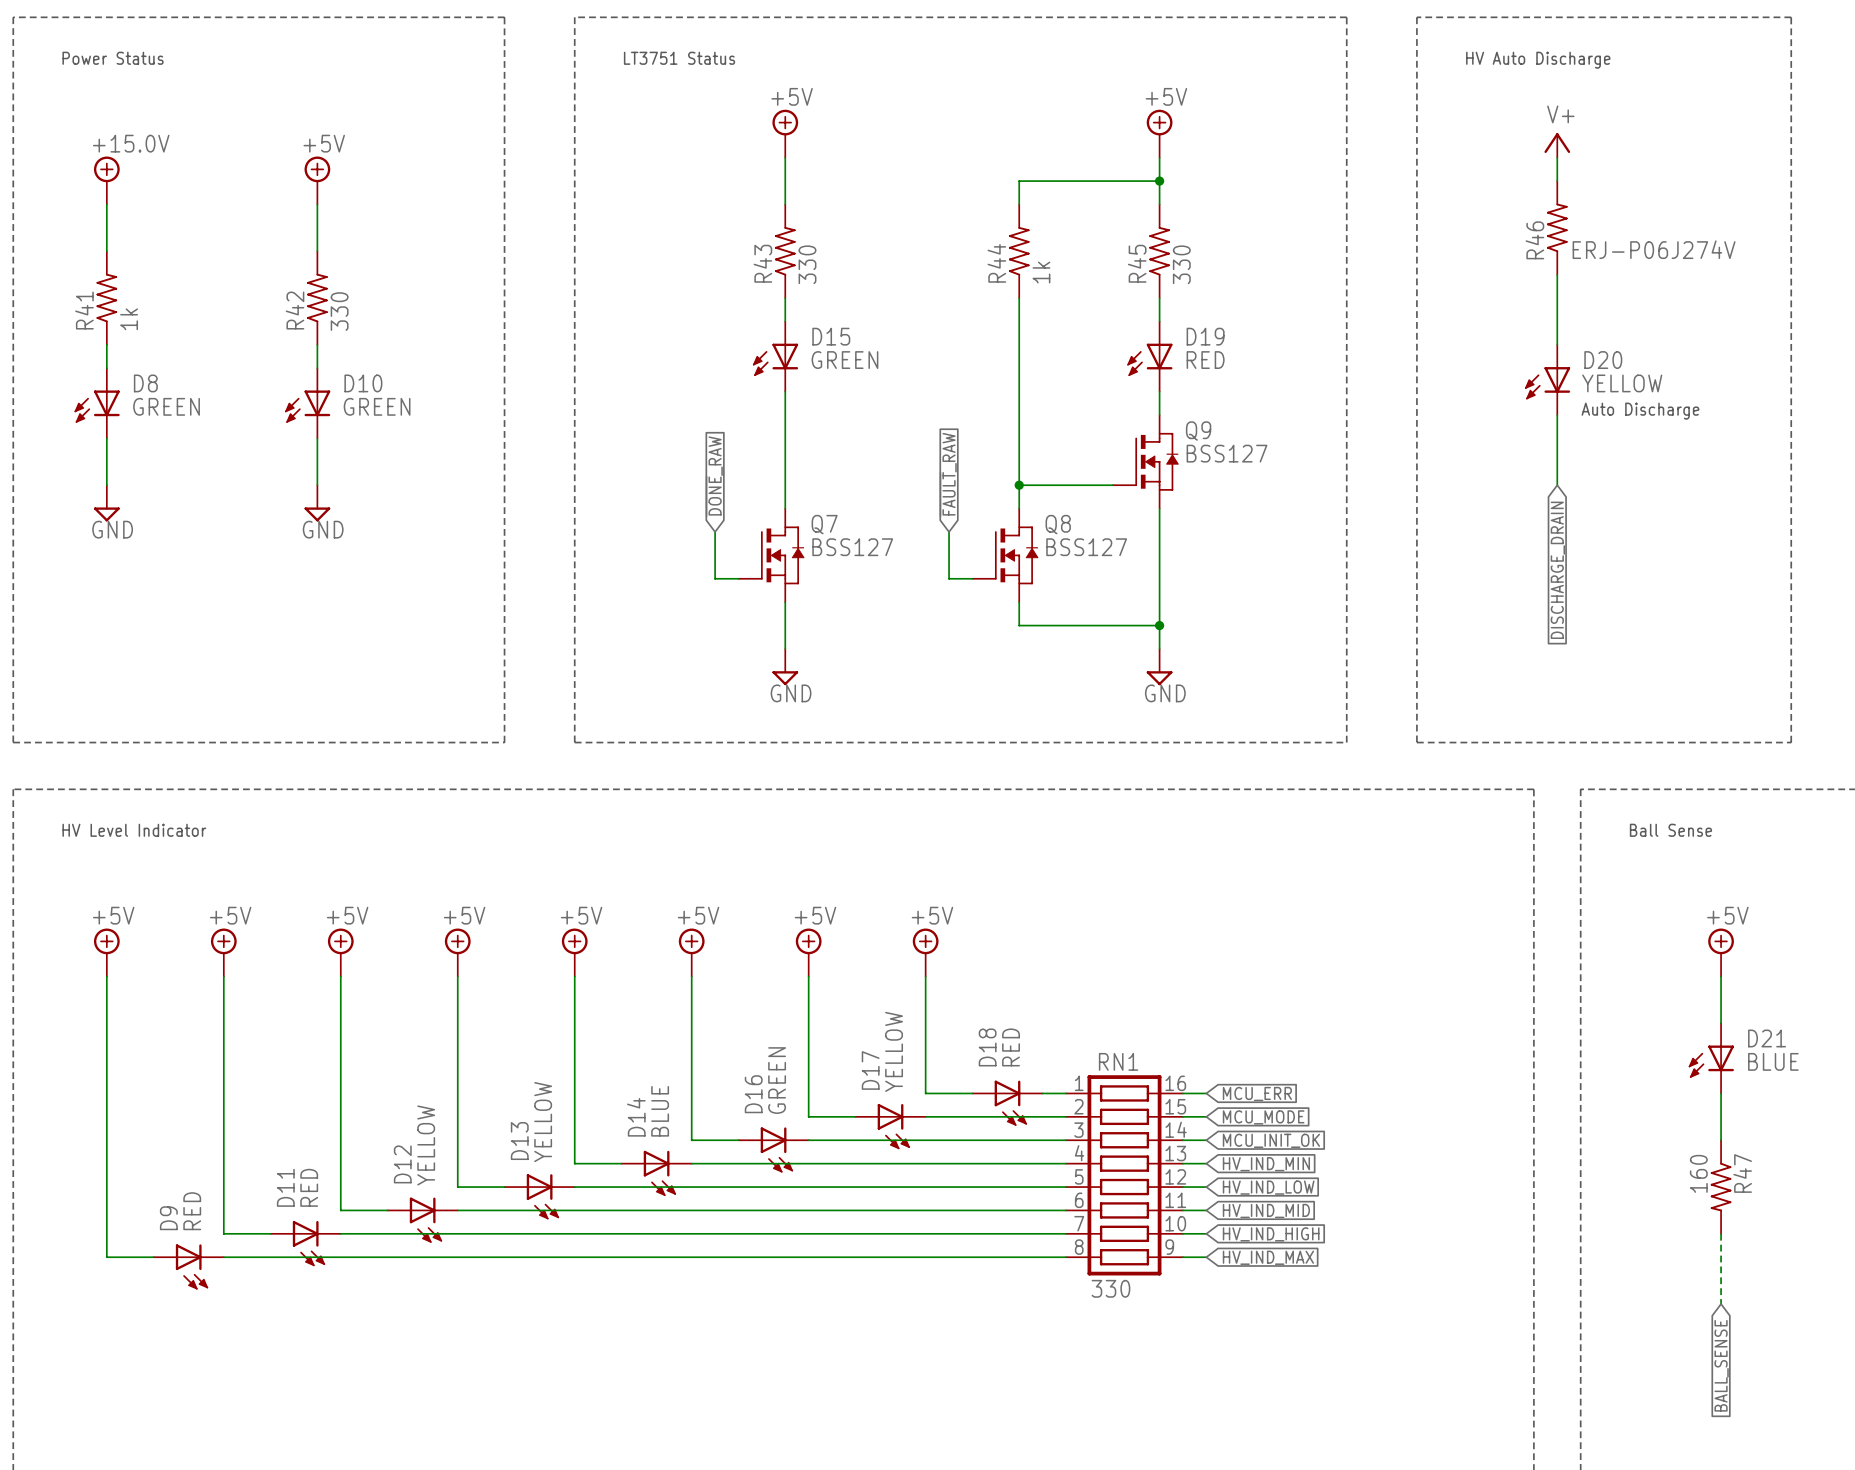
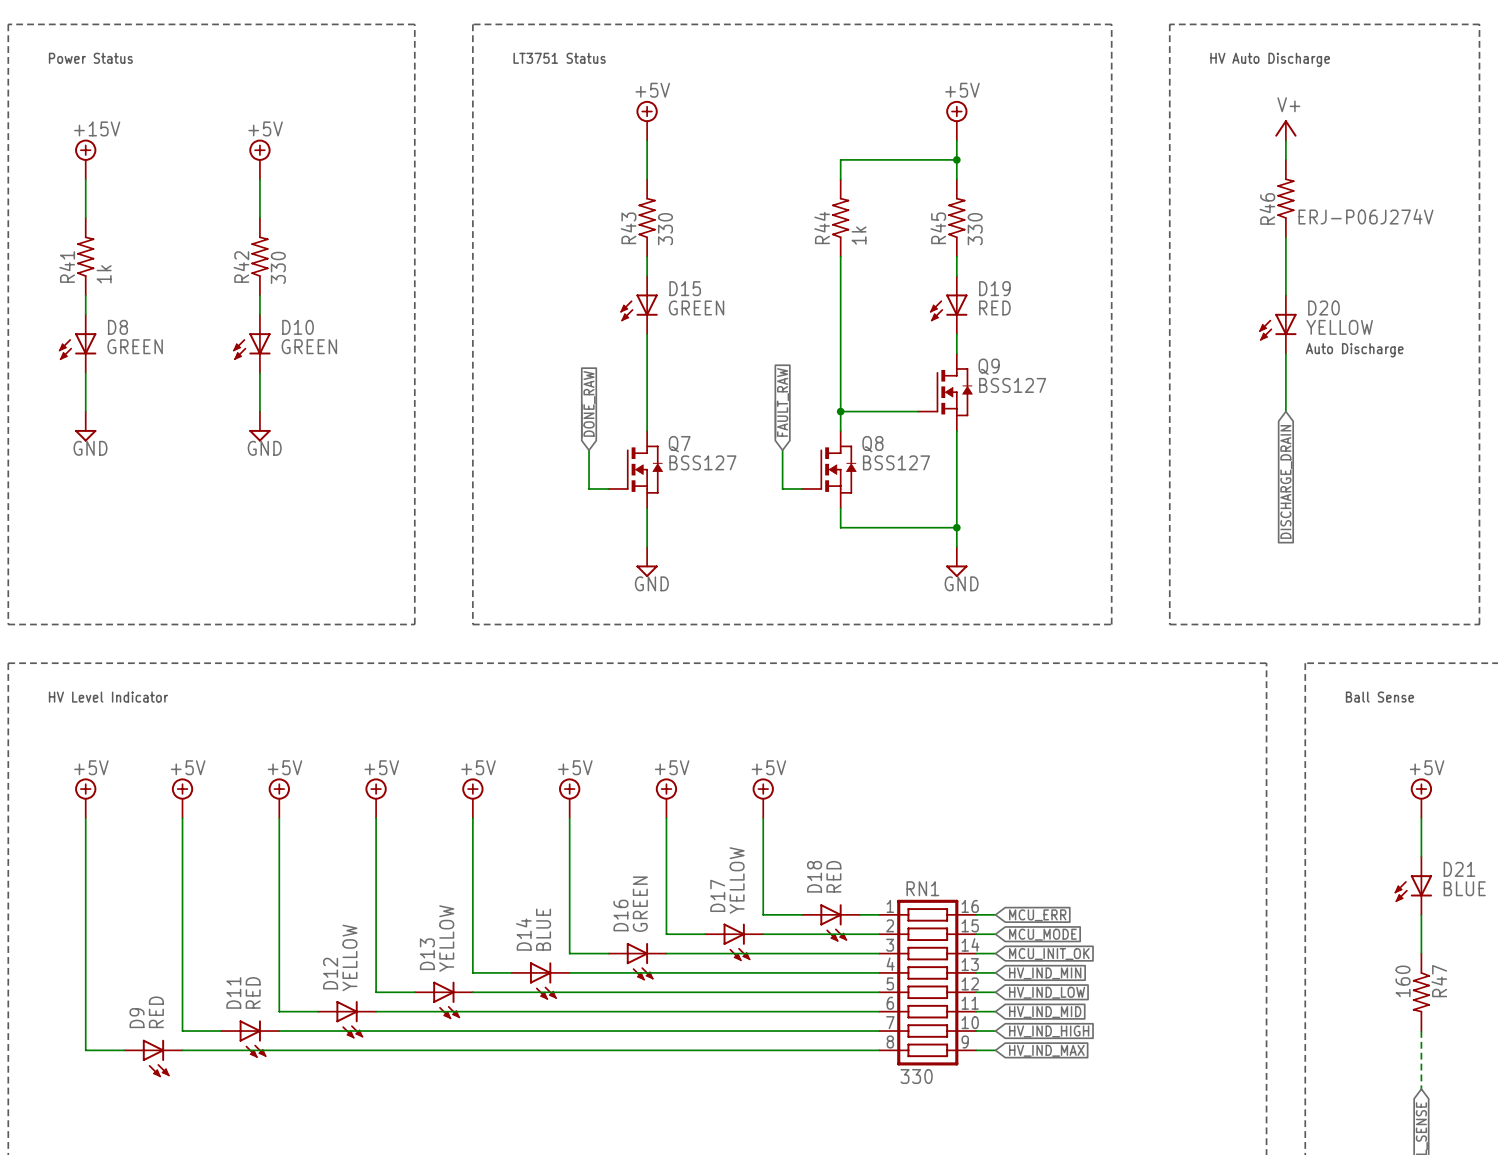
power symbol: +15.0V (106, 180) -> +15V (85, 159)

